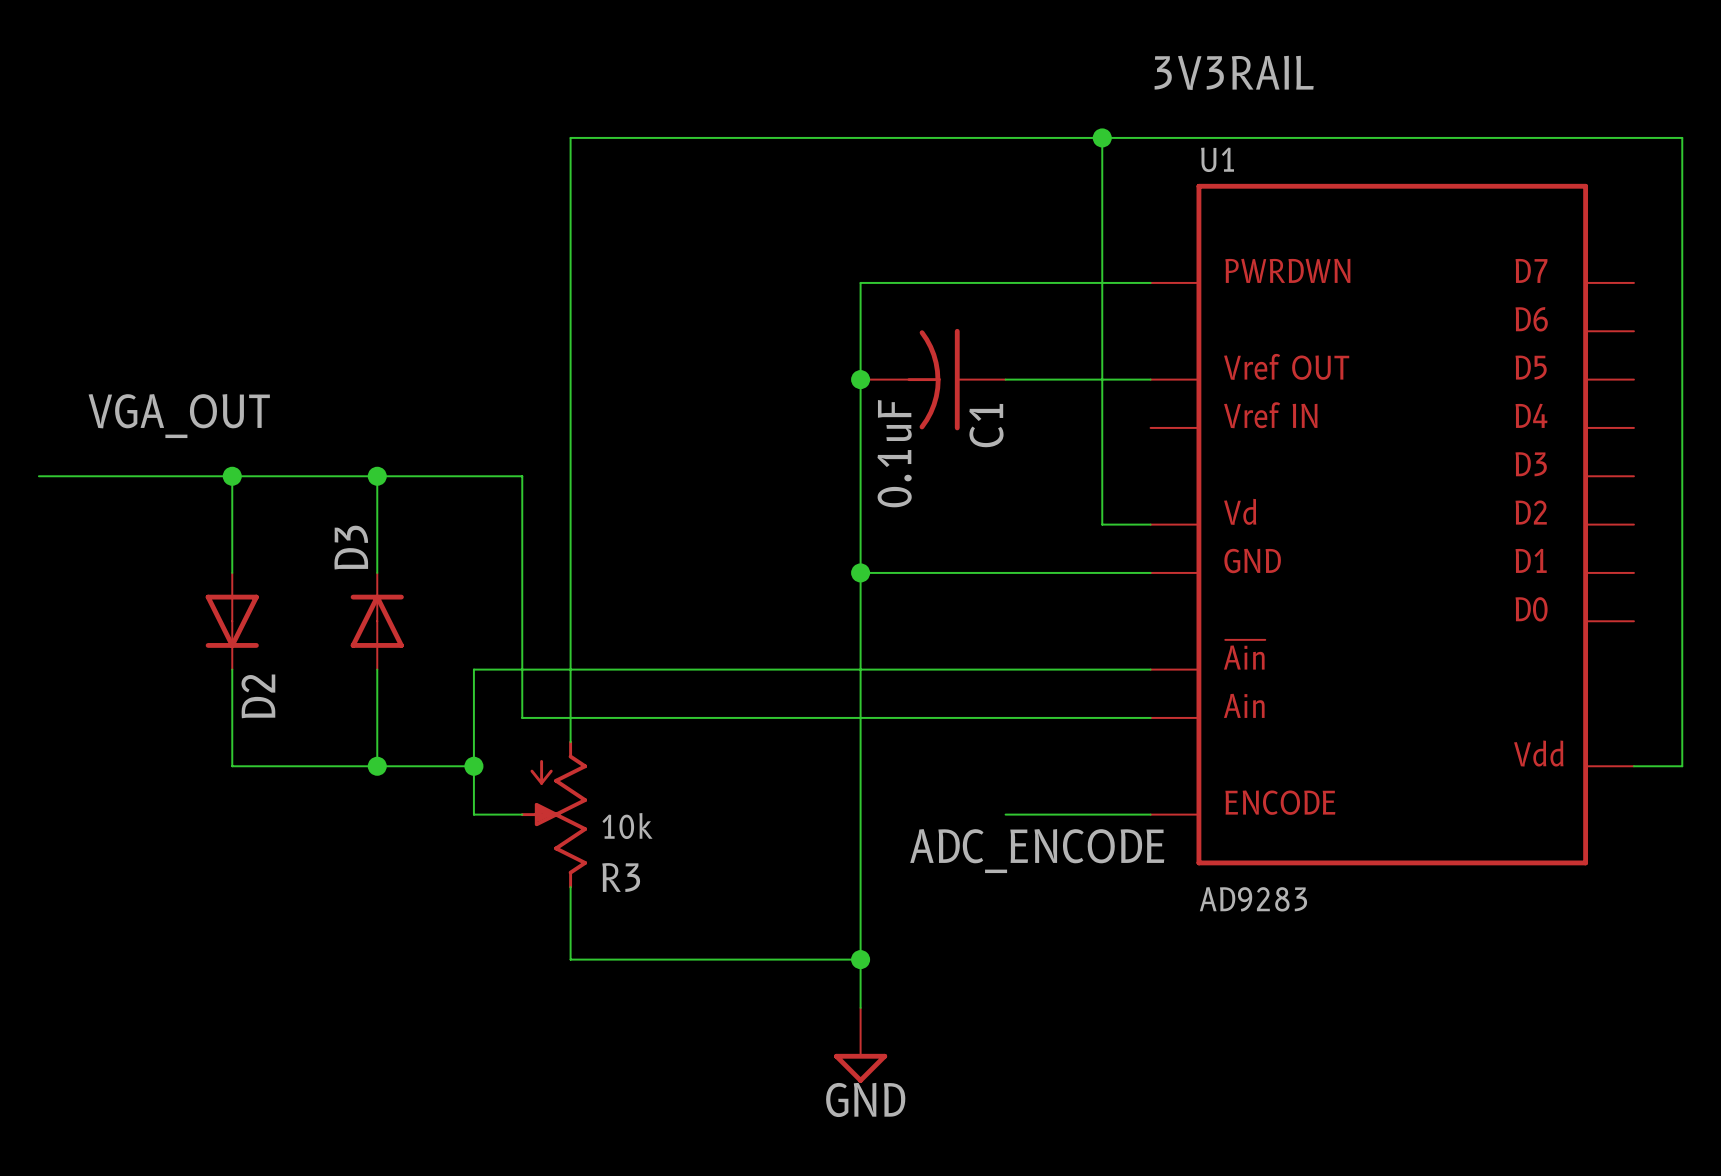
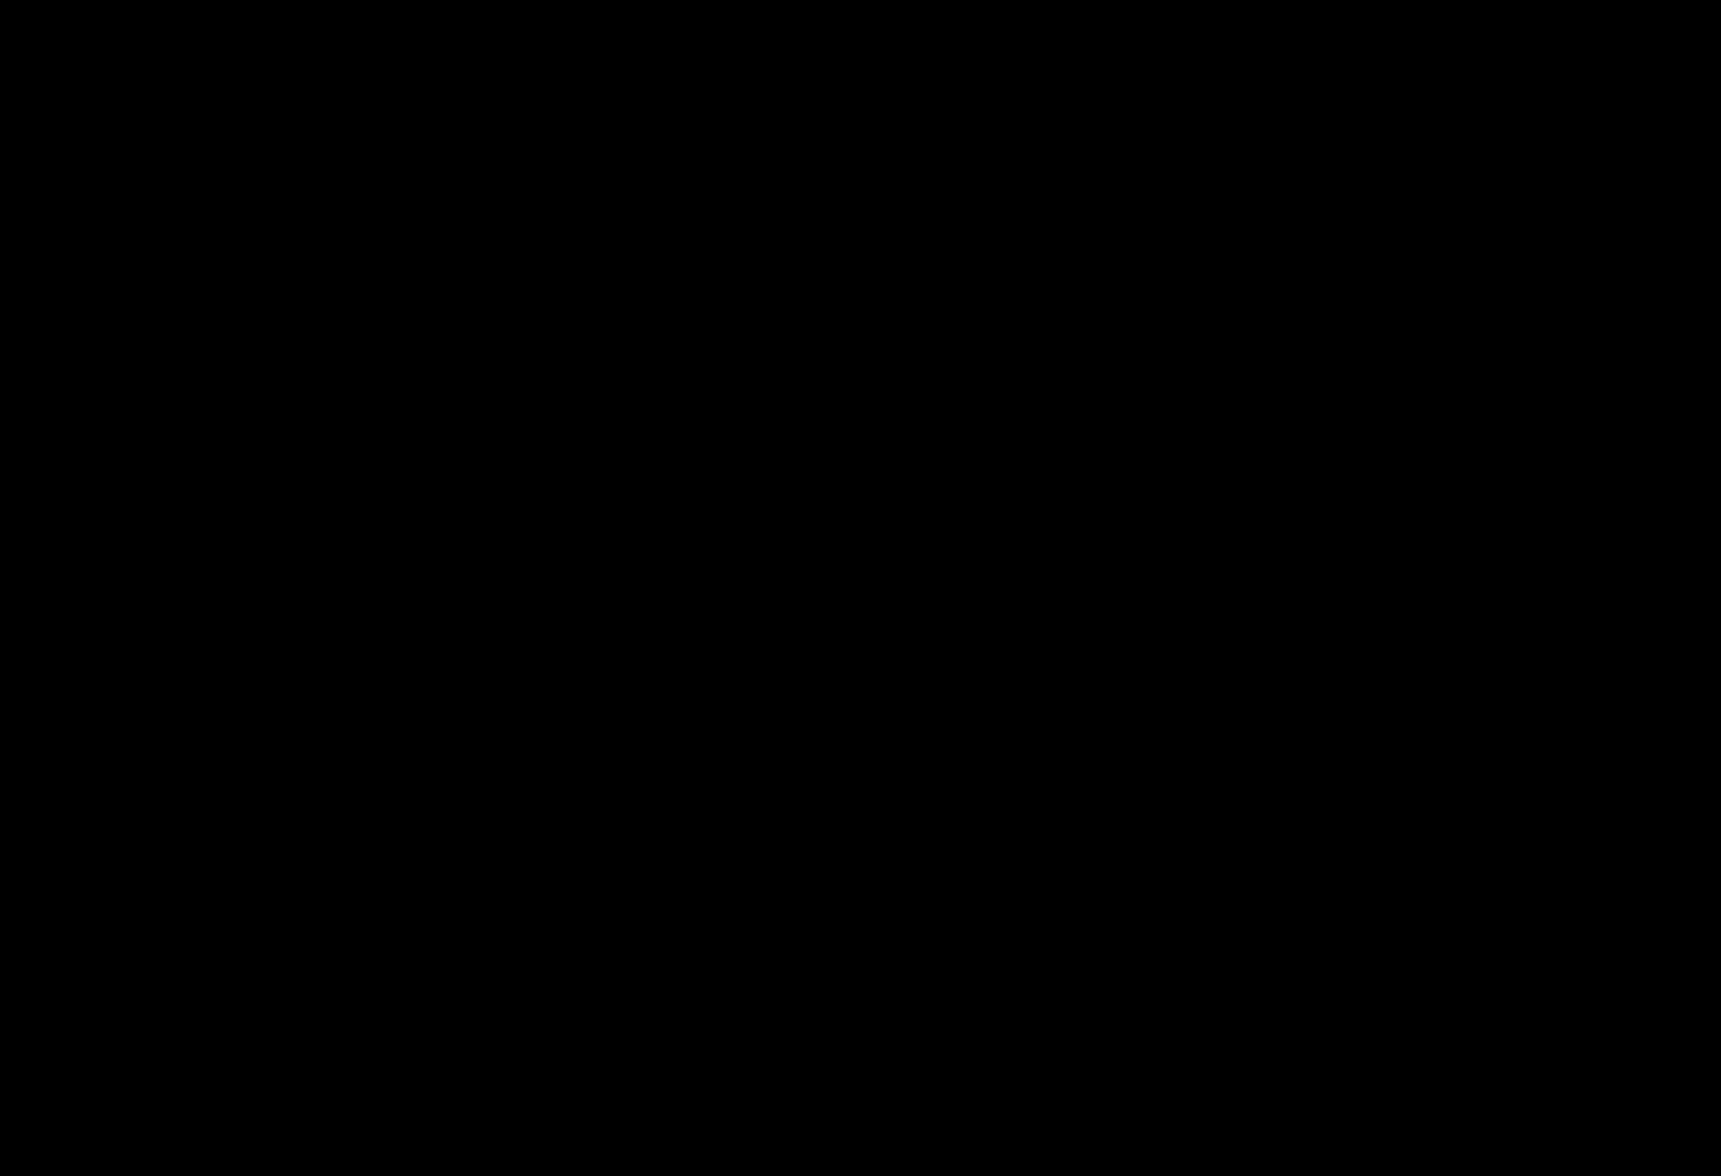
label: 3V3RAIL (1234, 72) -> none
wire: (1102, 137) (1102, 524) (1150, 524) -> none
junction: (1102, 137) -> none
wire: (1150, 282) (860, 282) (860, 1007) -> none
junction: (860, 379) -> none
C1: 0.1uF (933, 379) -> none
wire: (1005, 379) (1150, 379) -> none
label: VGA_OUT (179, 416) -> none
wire: (38, 476) (522, 476) (522, 717) (1150, 717) -> none
wire: (232, 476) (232, 572) -> none
junction: (232, 476) -> none
wire: (377, 476) (377, 572) -> none
junction: (377, 476) -> none
U1: AD9283 (1392, 524) -> none
wire: (860, 572) (1150, 572) -> none
junction: (860, 572) -> none
D2: (232, 621) -> none
D3: (377, 621) -> none
wire: (232, 669) (232, 766) (473, 766) -> none
wire: (377, 669) (377, 766) -> none
wire: (1150, 669) (473, 669) (473, 814) (522, 814) -> none
wire: (570, 742) (570, 137) (1682, 137) (1682, 766) (1633, 766) -> none
junction: (377, 766) -> none
junction: (473, 766) -> none
R3: 10k (553, 814) -> none
wire: (1005, 814) (1150, 814) -> none
label: ADC_ENCODE (1037, 851) -> none
wire: (570, 887) (570, 959) (860, 959) -> none
junction: (860, 959) -> none
power symbol: GND (860, 1045) -> none

